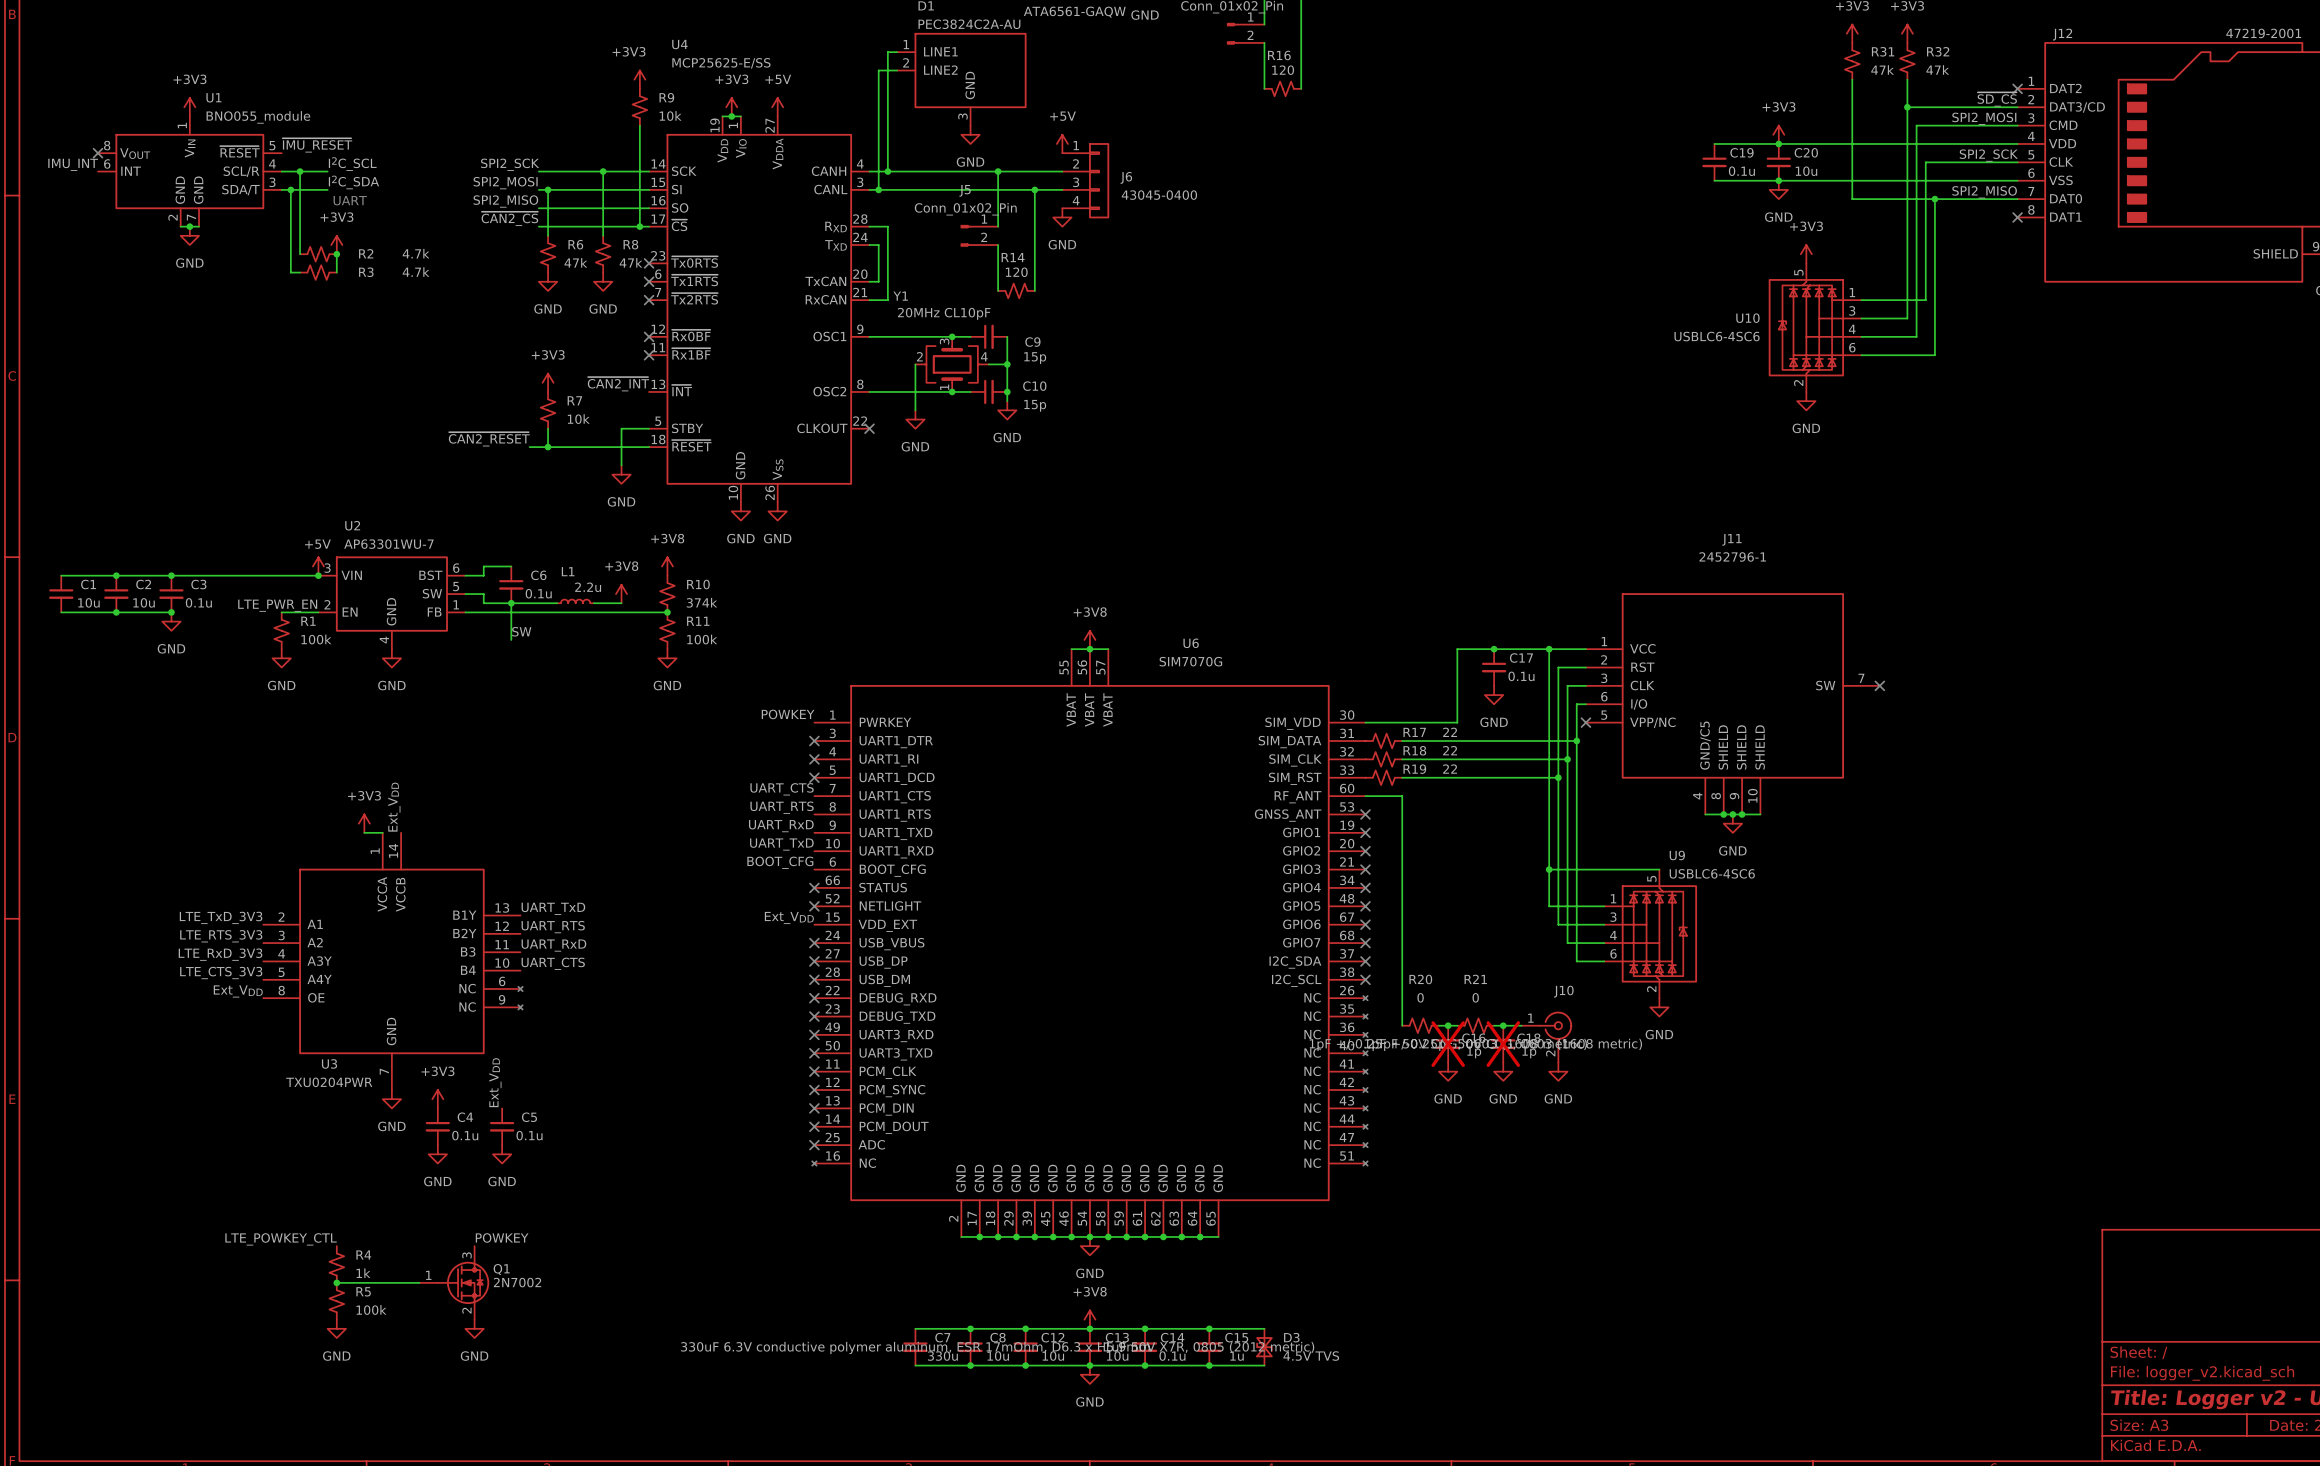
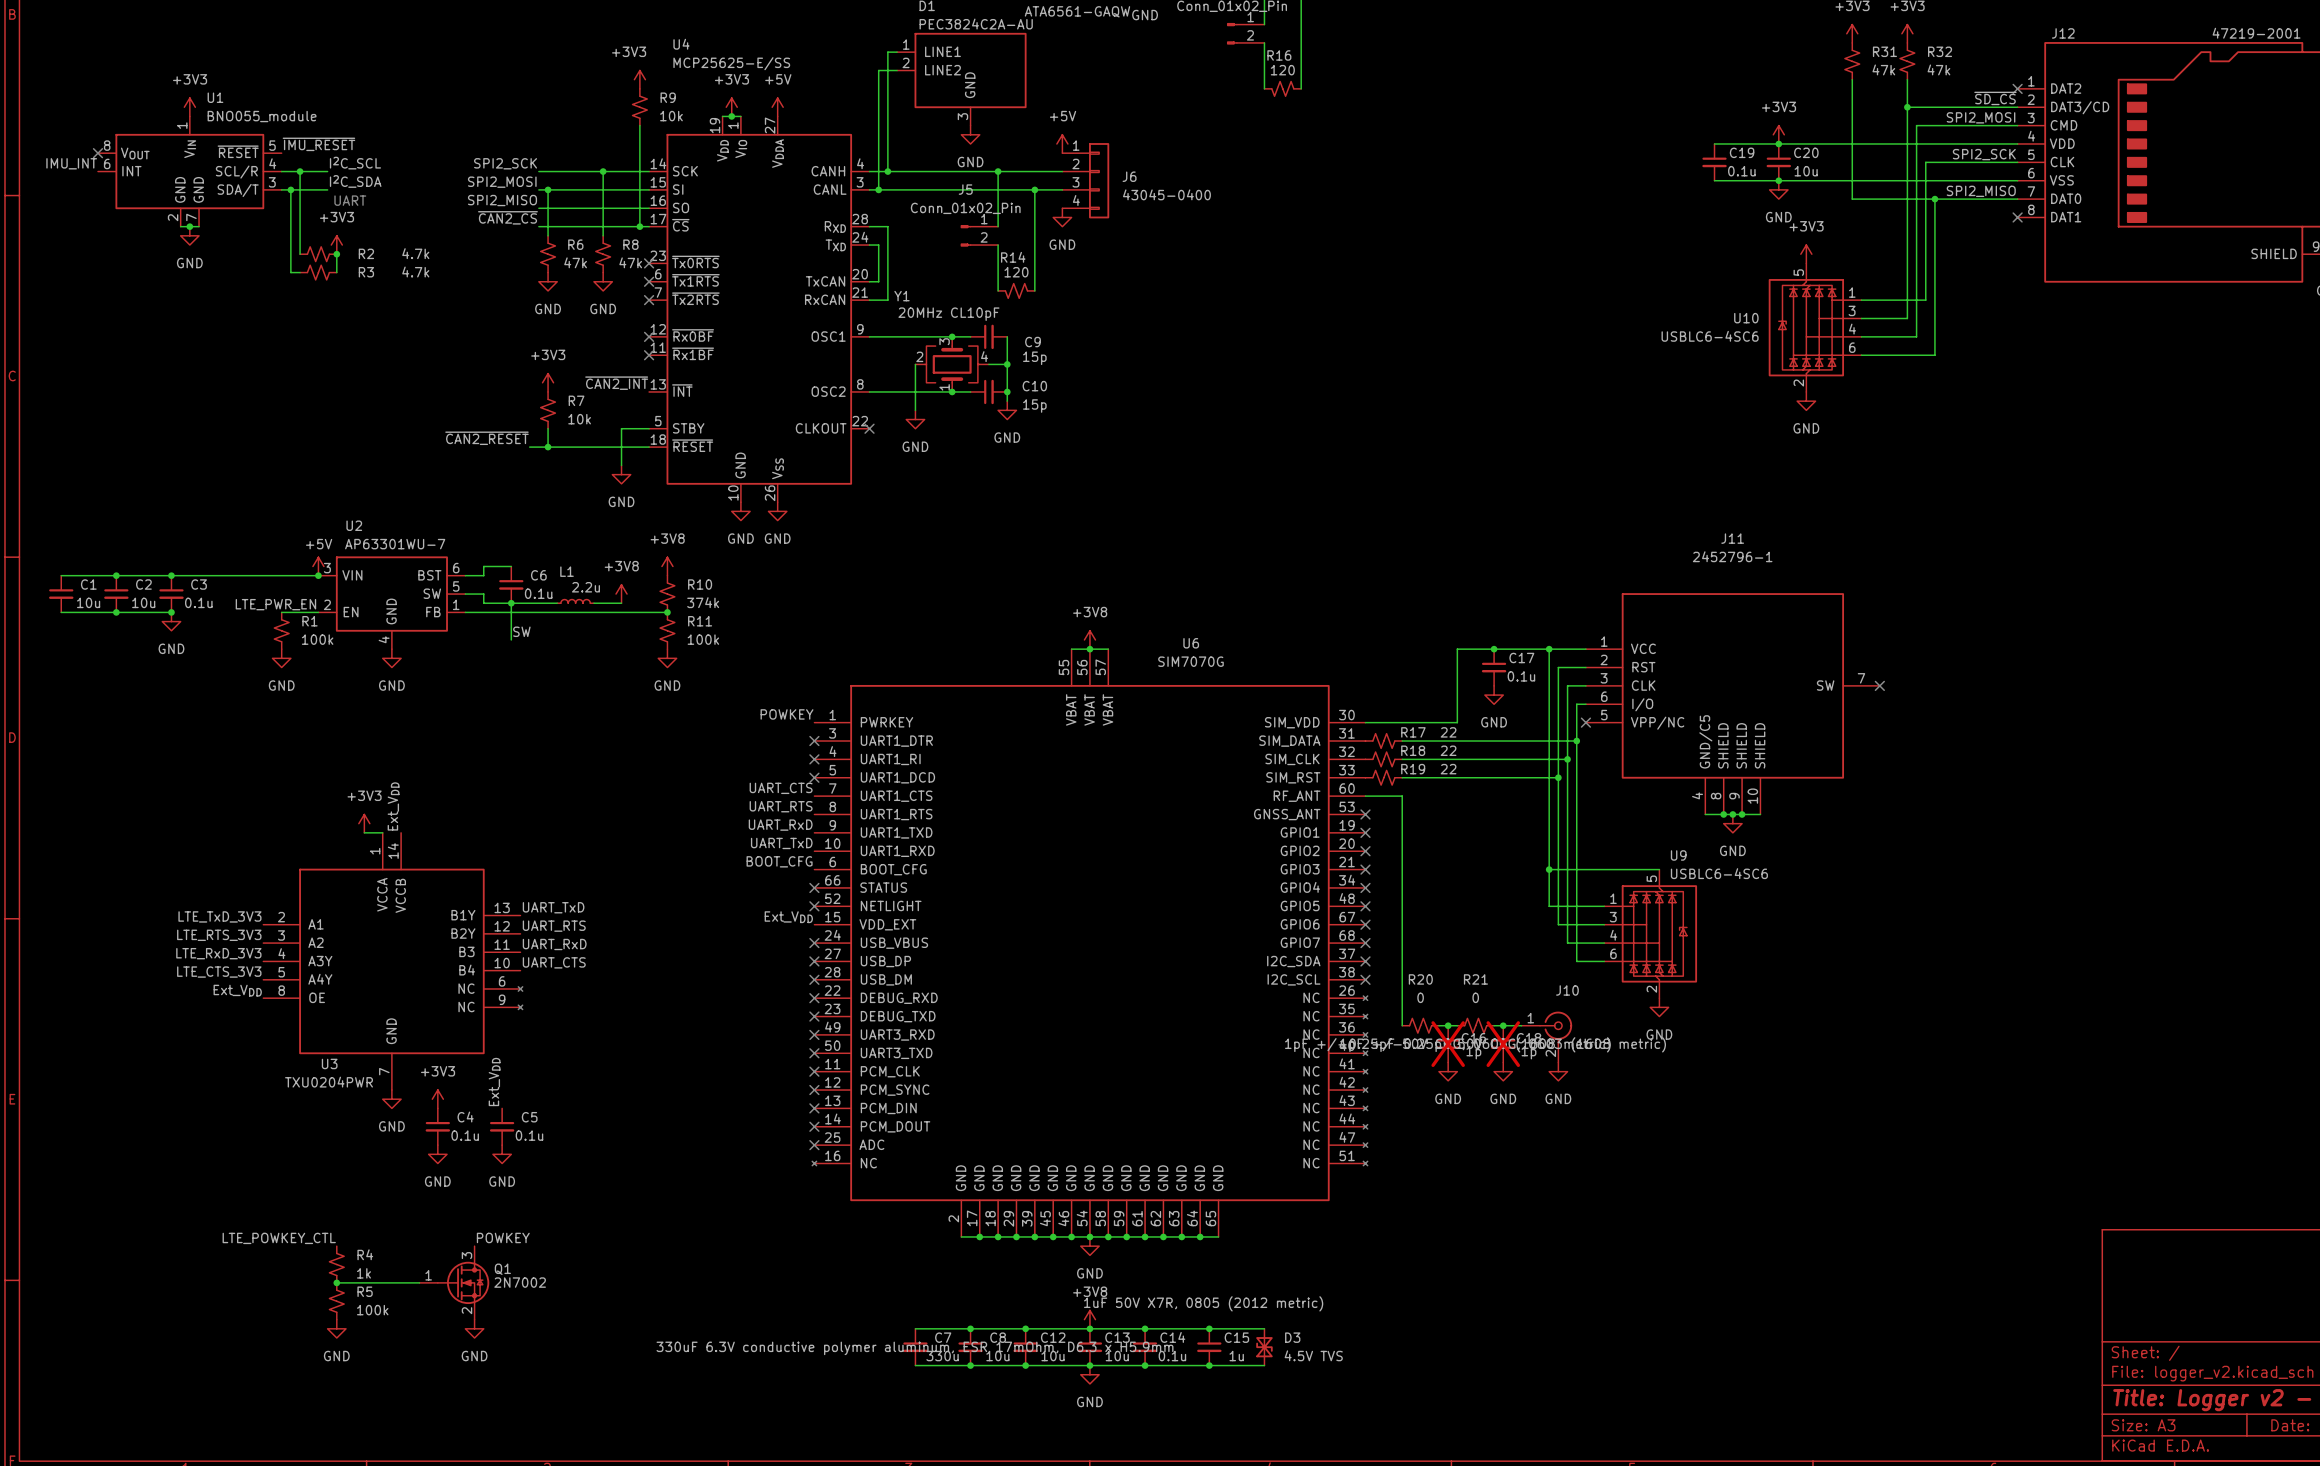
C15 text position: 1uF 50V X7R, 0805 (2012 metric) (1209, 1347) -> 1uF 50V X7R, 0805 (2012 metric) (1203, 1303)

